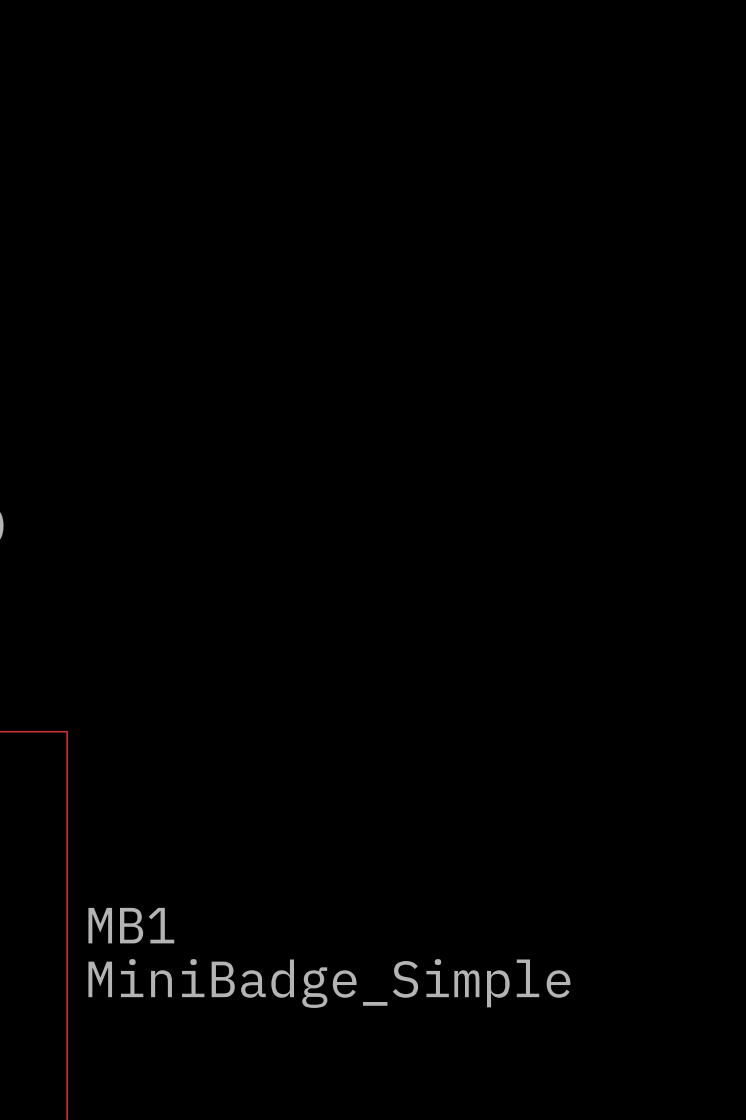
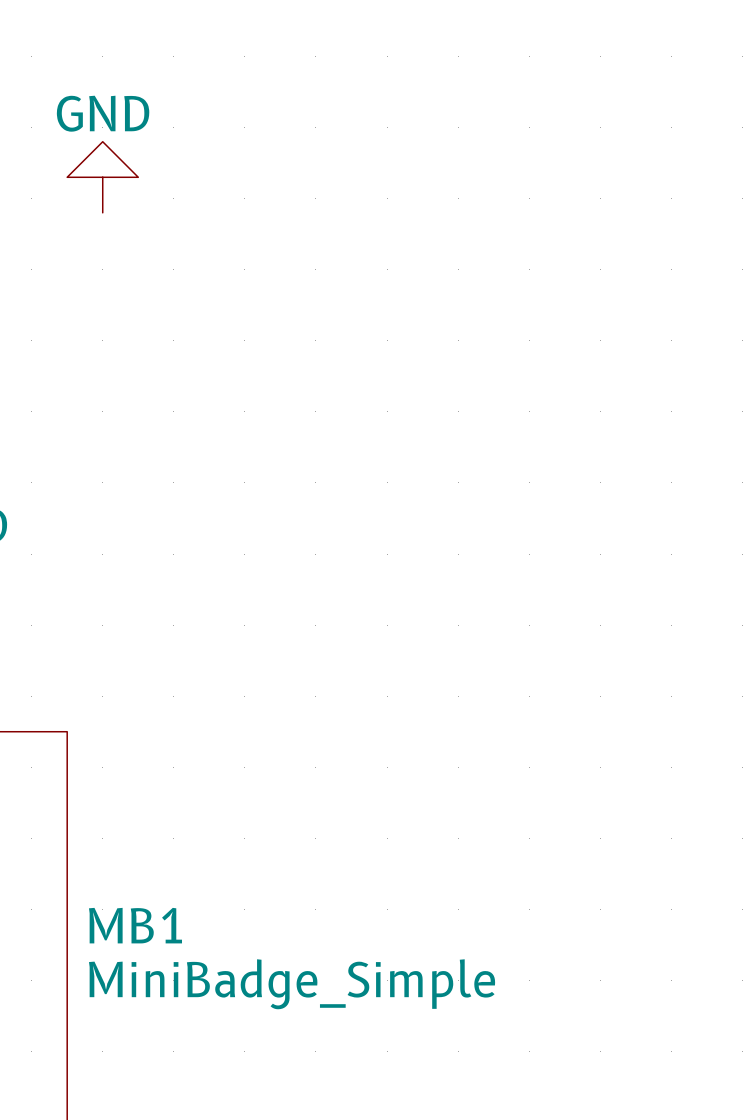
power symbol: none -> GND (102, 177)

